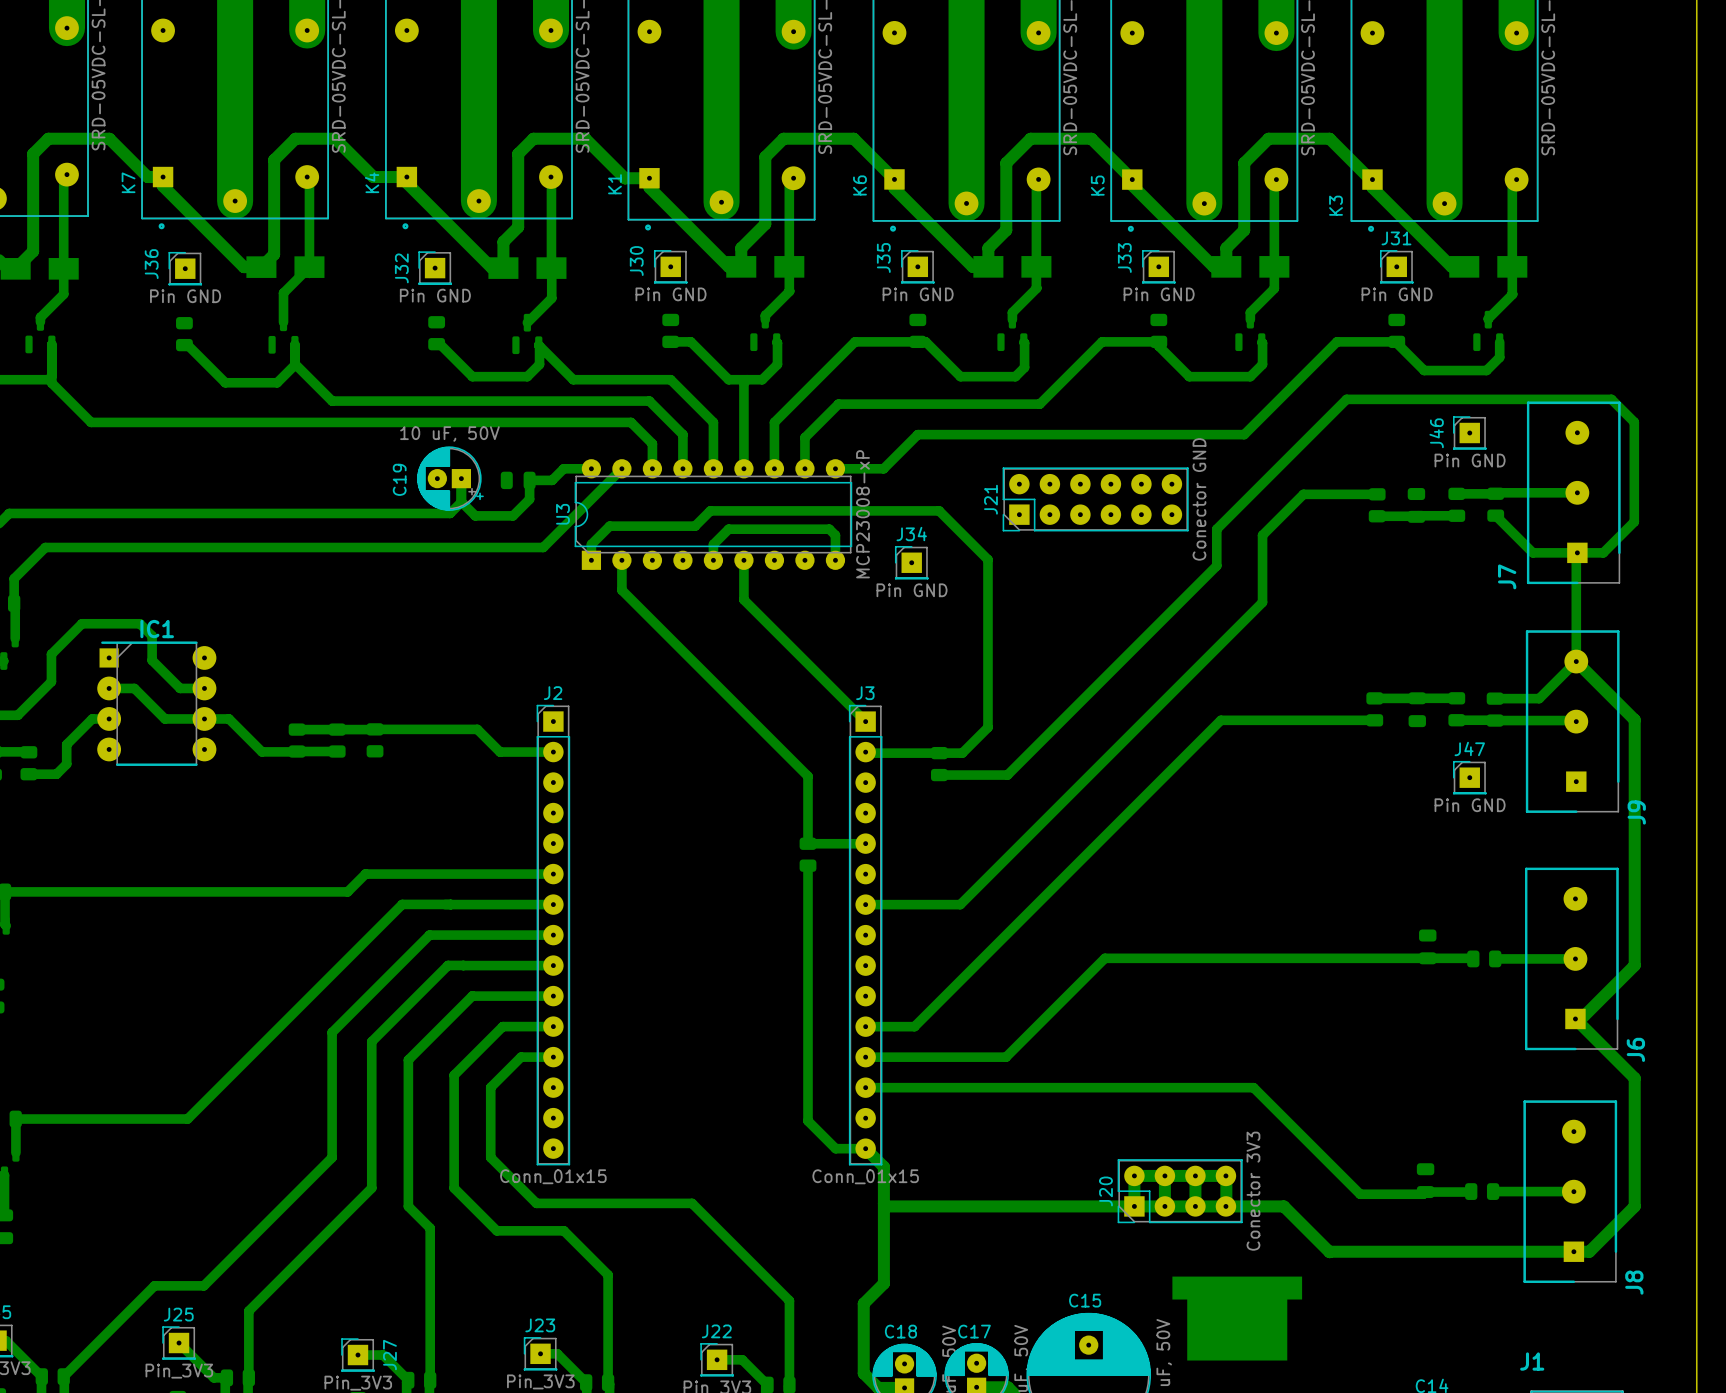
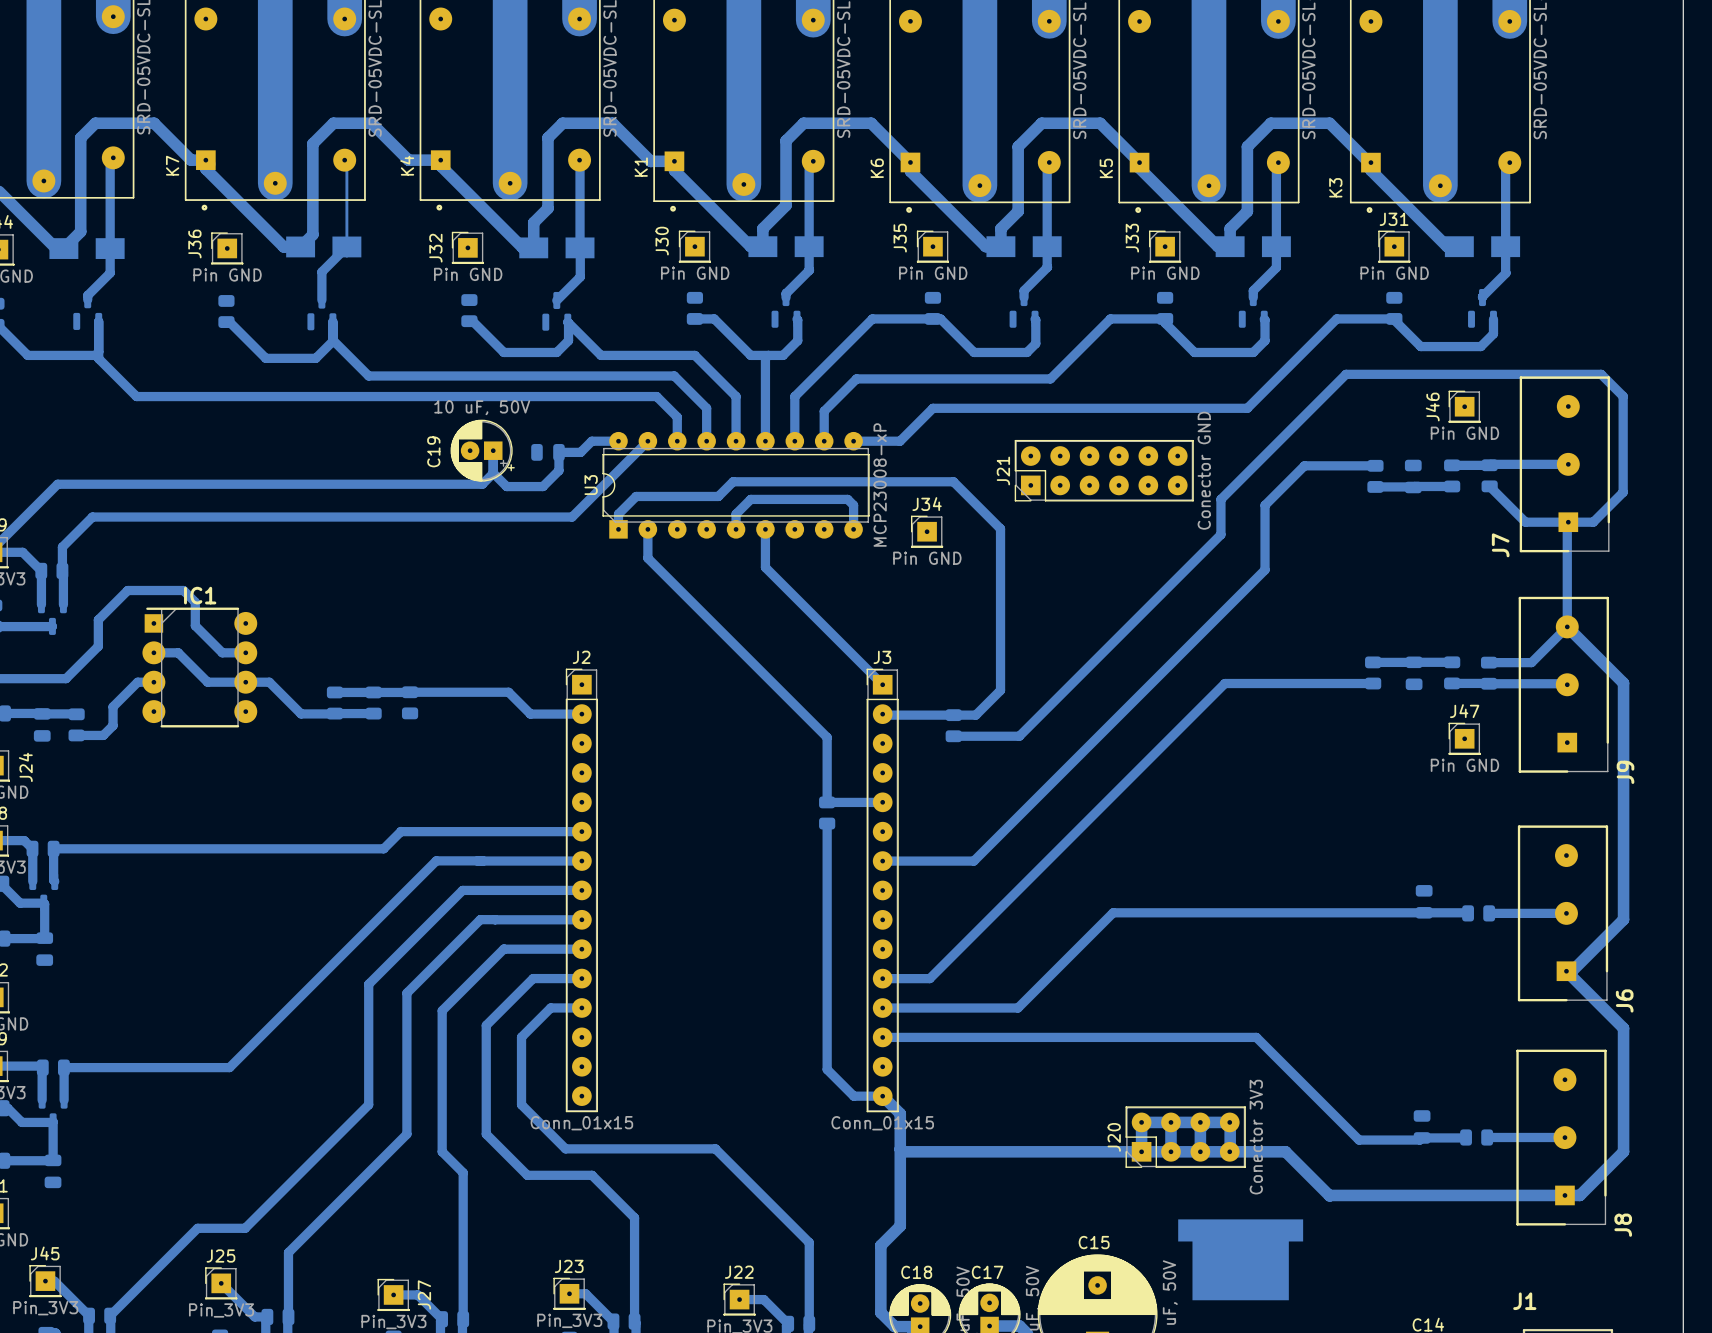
bottom track width: thick (307, 177) (309, 179) (309, 267) -> thin (344, 160) (346, 162) (346, 246)

